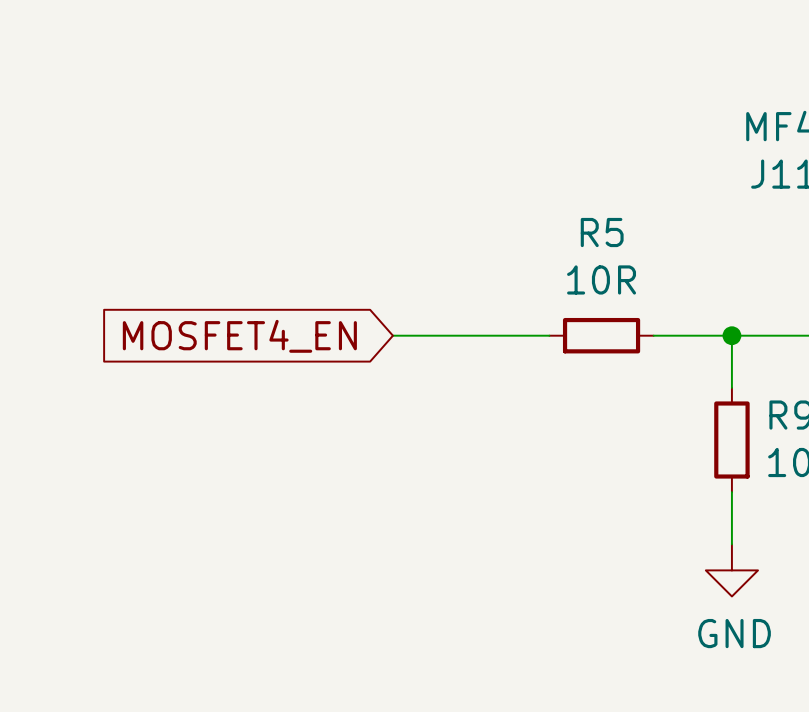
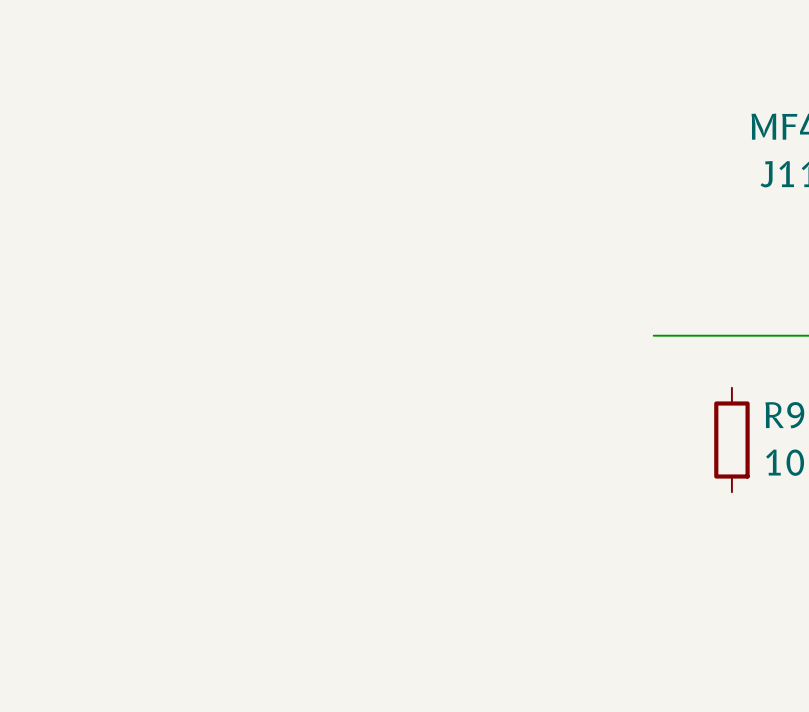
wire: (392, 335) (549, 335) -> none
R5: 10R (601, 335) -> none
wire: (731, 335) (731, 387) -> none
junction: (731, 335) -> none
global label: MOSFET4_EN (239, 336) -> none
wire: (731, 492) (731, 544) -> none
power symbol: GND (731, 570) -> none

